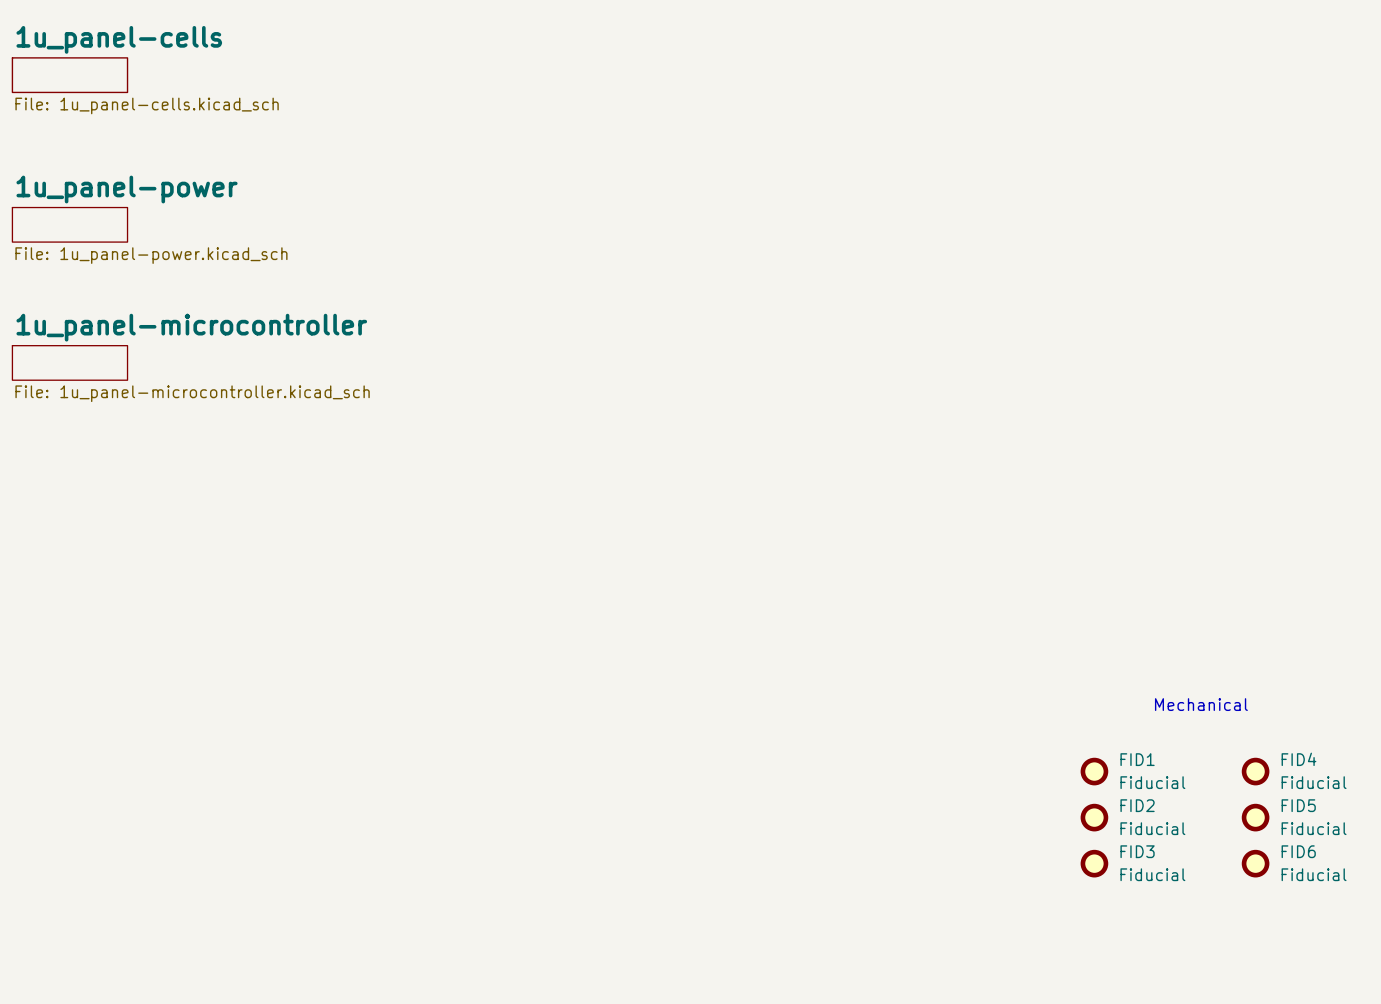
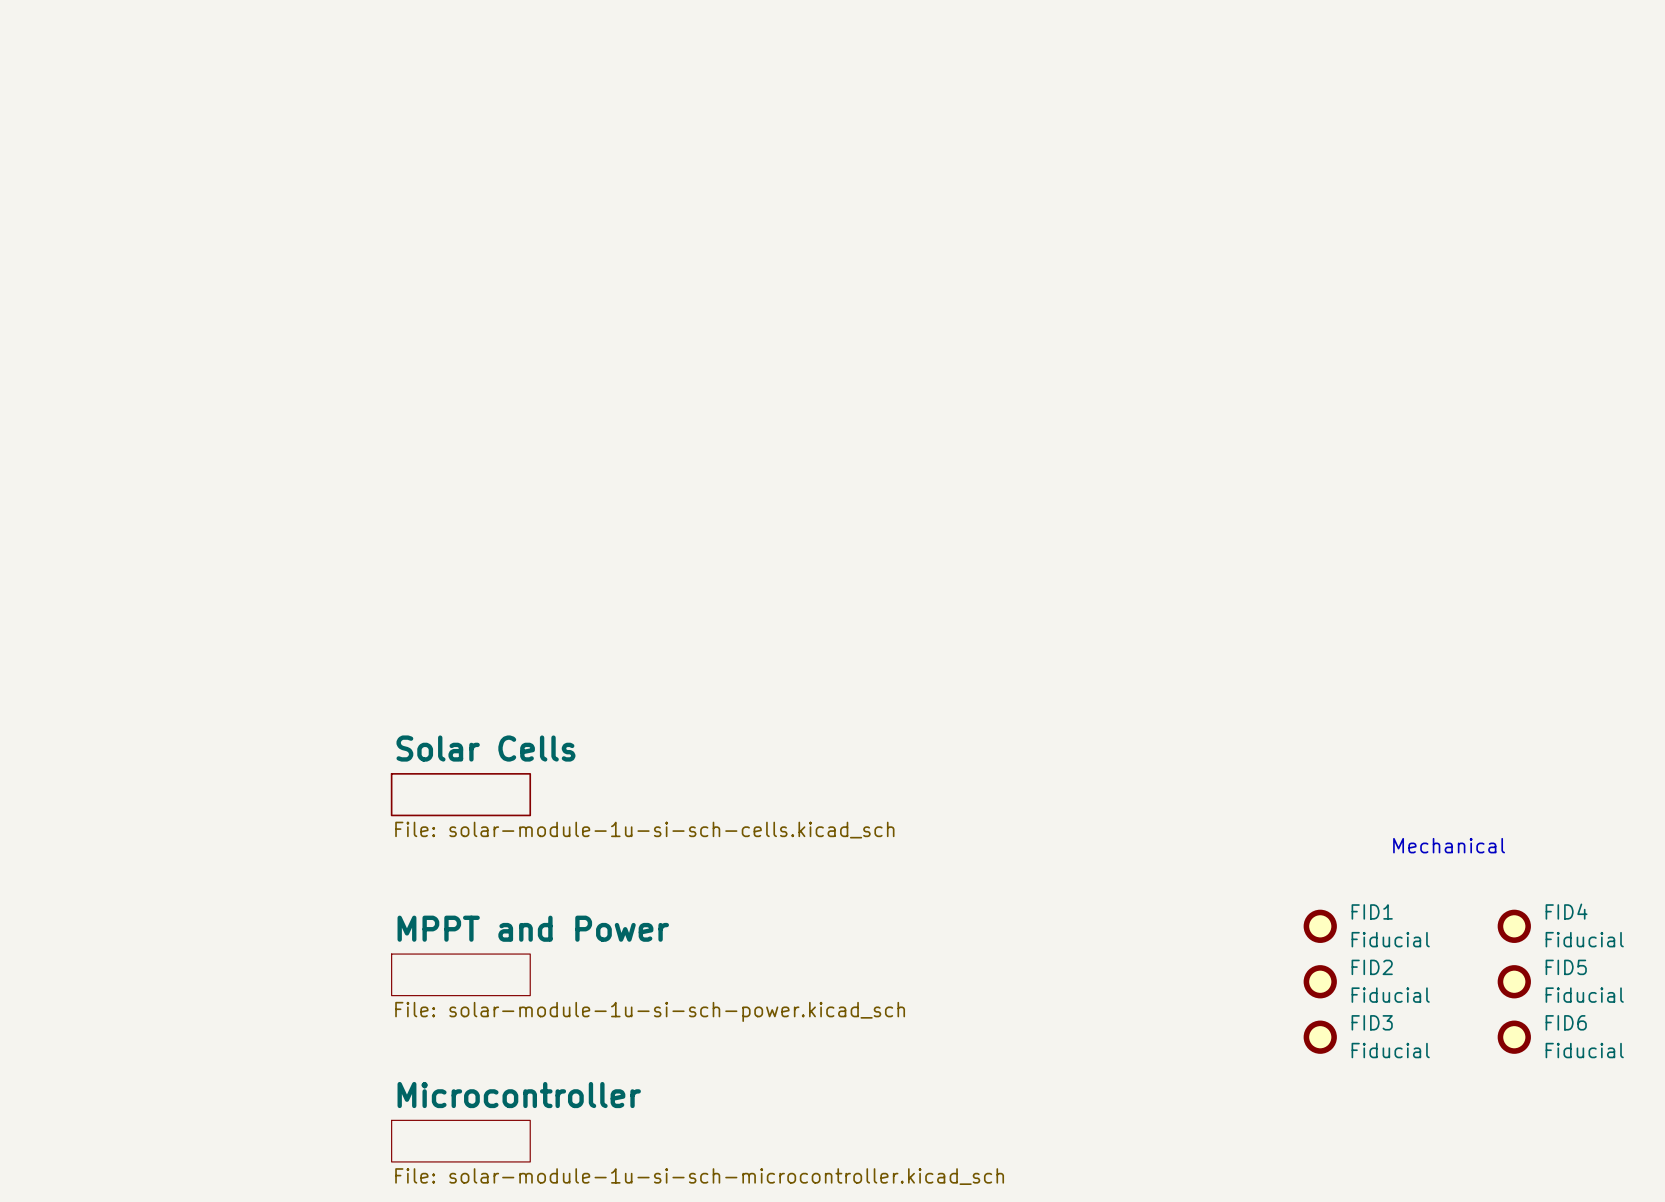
sheet 1u_panel-cells: File: 1u_panel-cells.kicad_sch (69, 75) -> none
sheet 1u_panel-power: File: 1u_panel-power.kicad_sch (69, 224) -> none
sheet 1u_panel-microcontroller: File: 1u_panel-microcontroller.kicad_sch (69, 362) -> none
sheet Solar Cells: none -> File: solar-module-1u-si-sch-cells.kicad_sch (460, 794)
sheet MPPT and Power: none -> File: solar-module-1u-si-sch-power.kicad_sch (460, 974)
sheet Microcontroller: none -> File: solar-module-1u-si-sch-microcontroller.kicad_sch (460, 1141)

